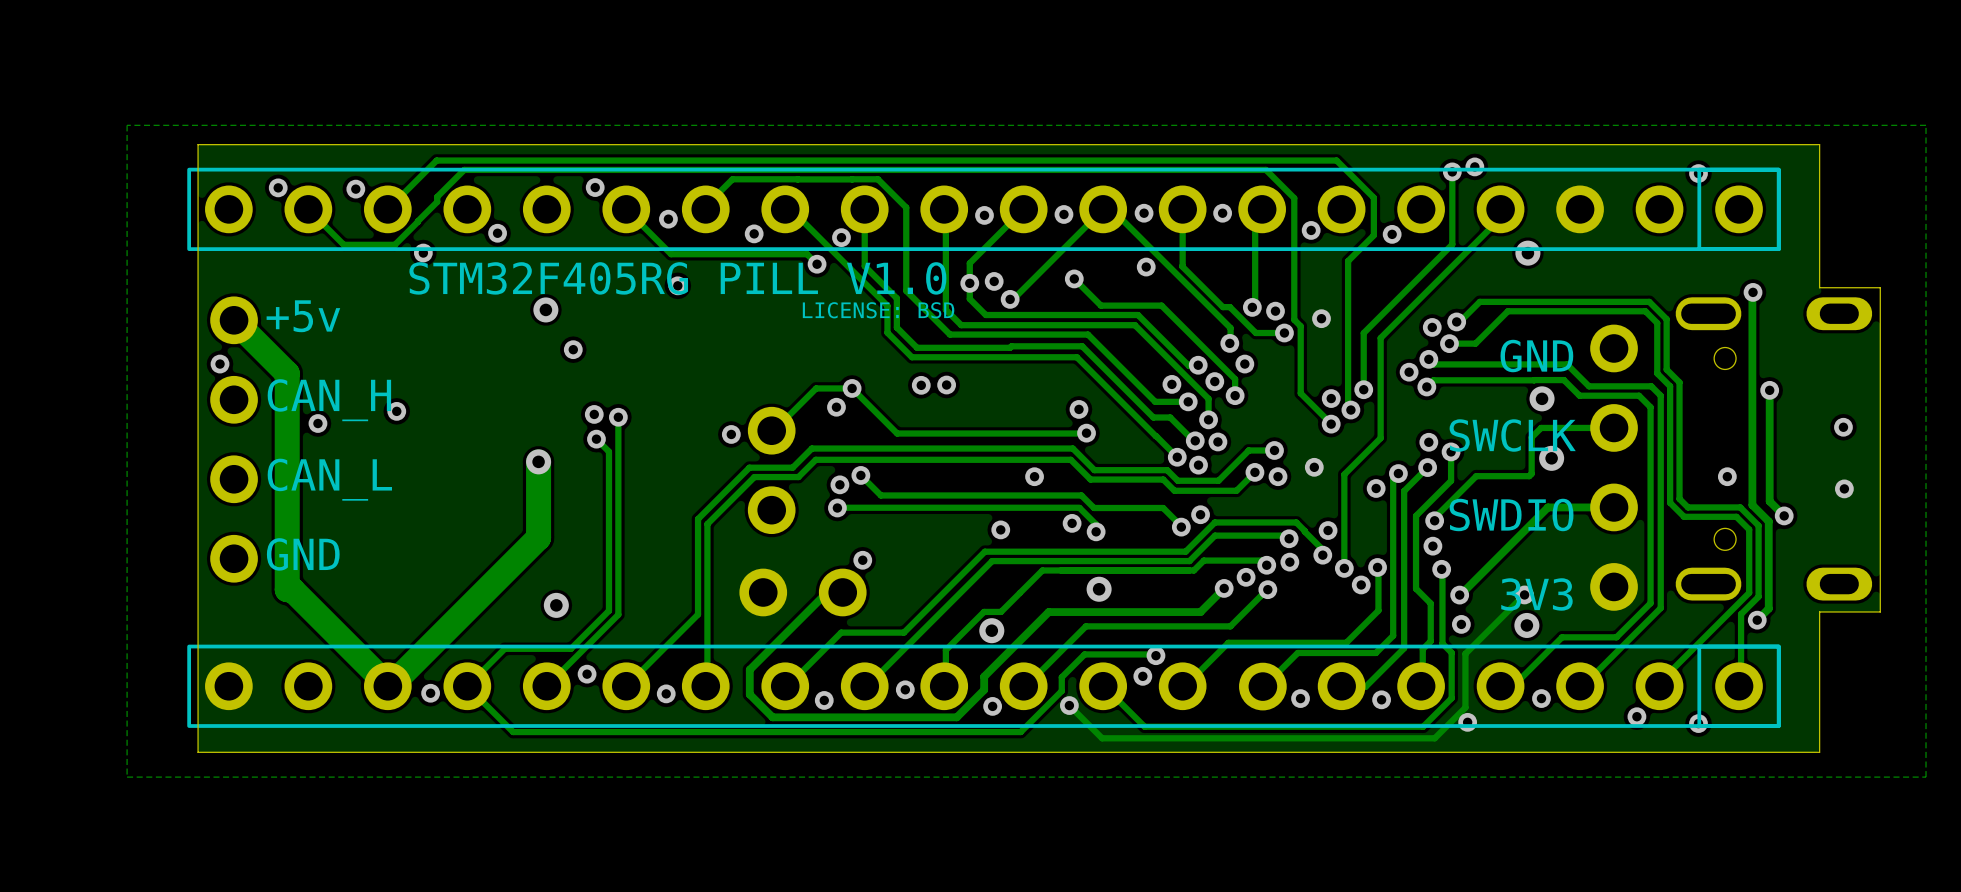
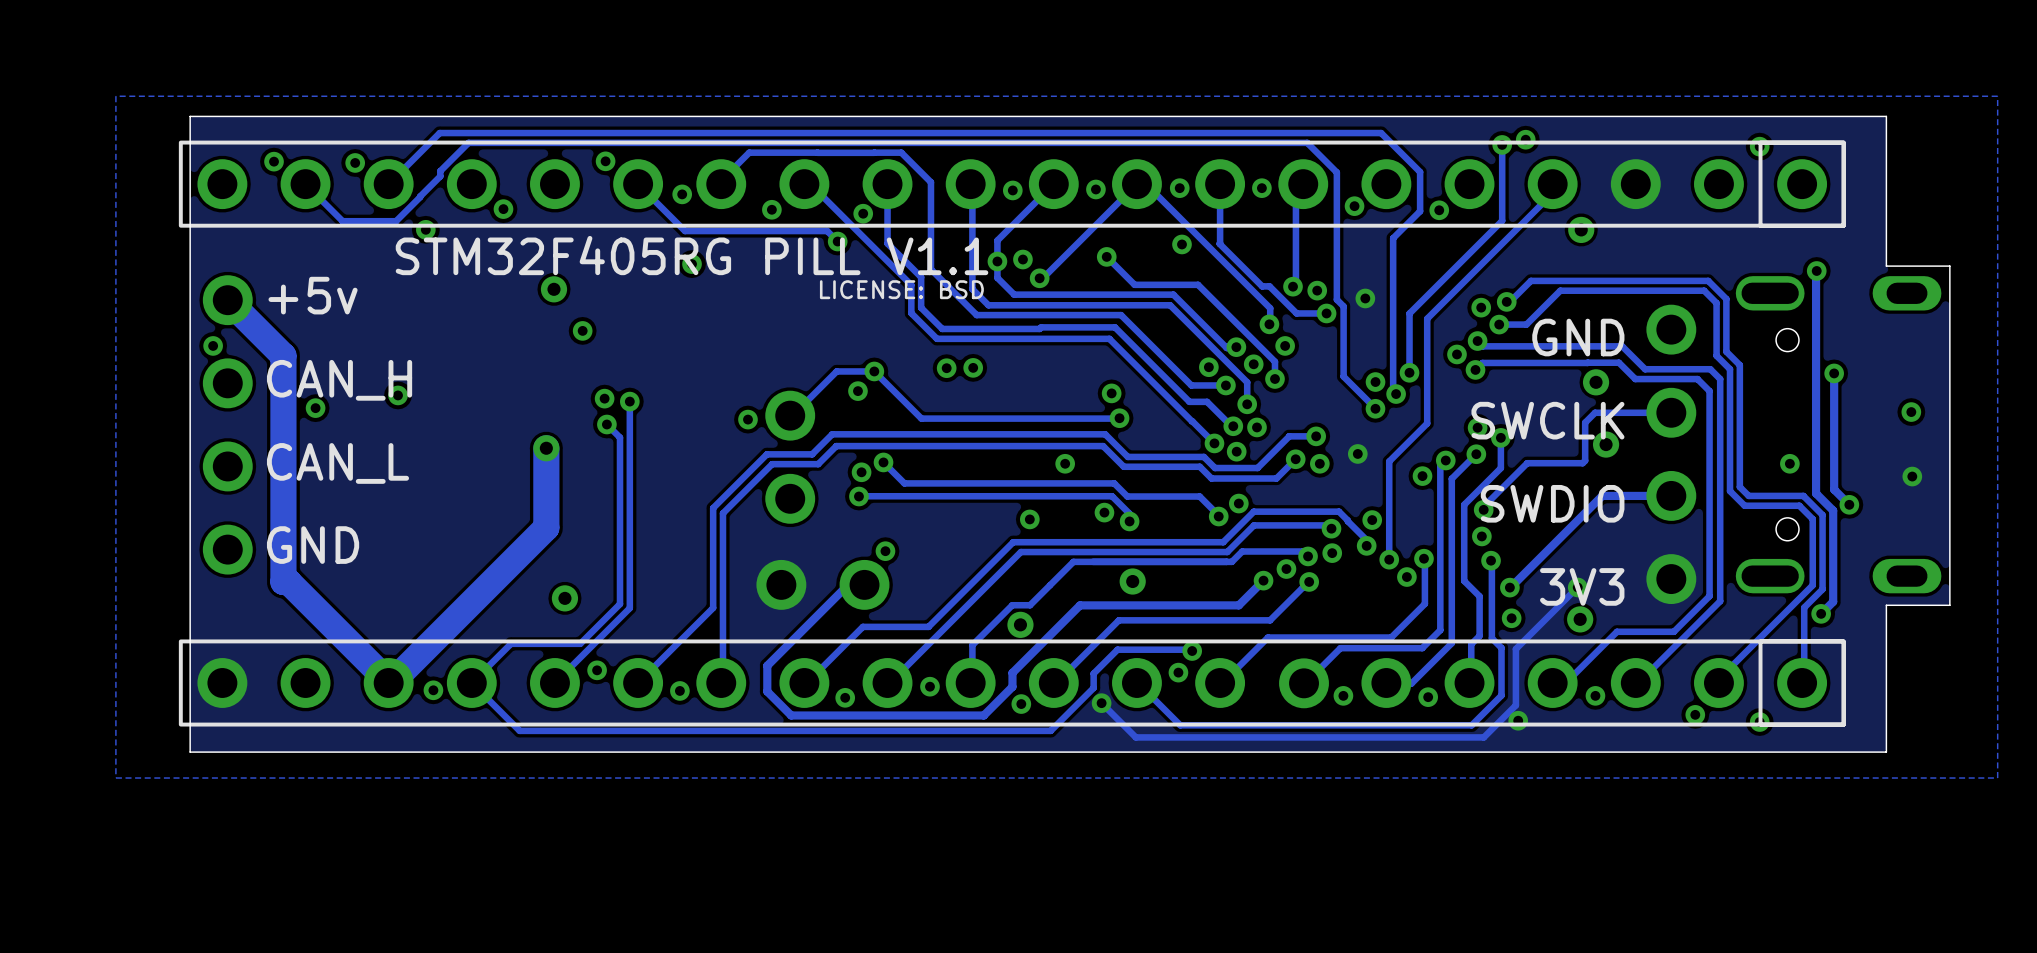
text: STM32F405RG PILL V1.0 (677, 278) -> STM32F405RG PILL V1.1 (692, 255)

